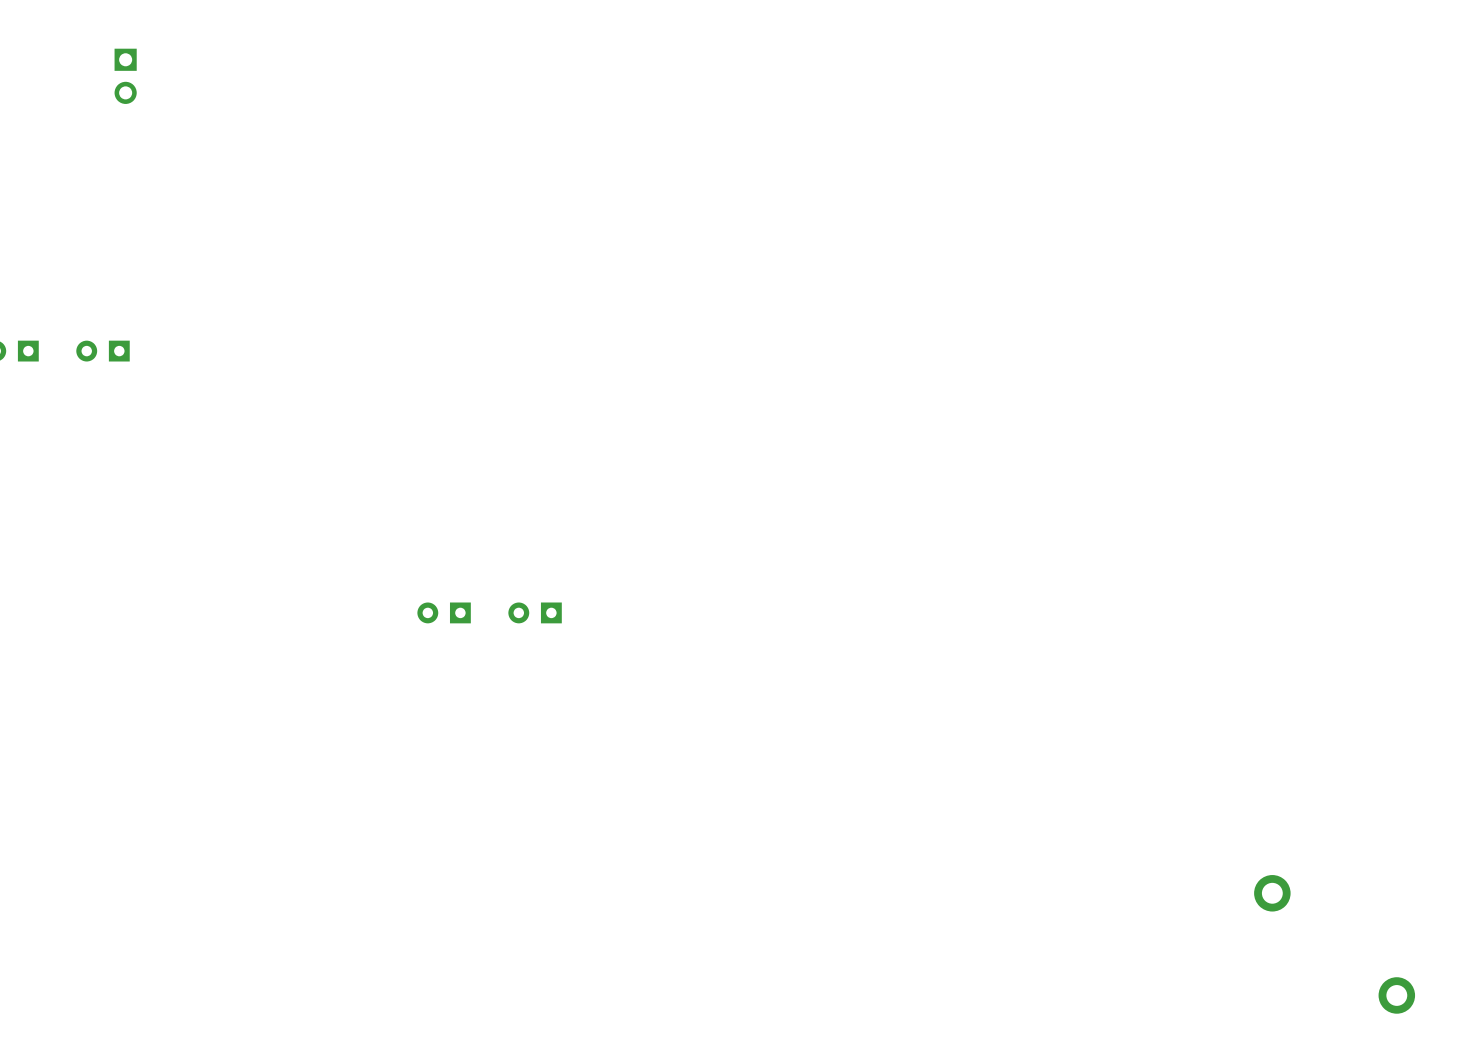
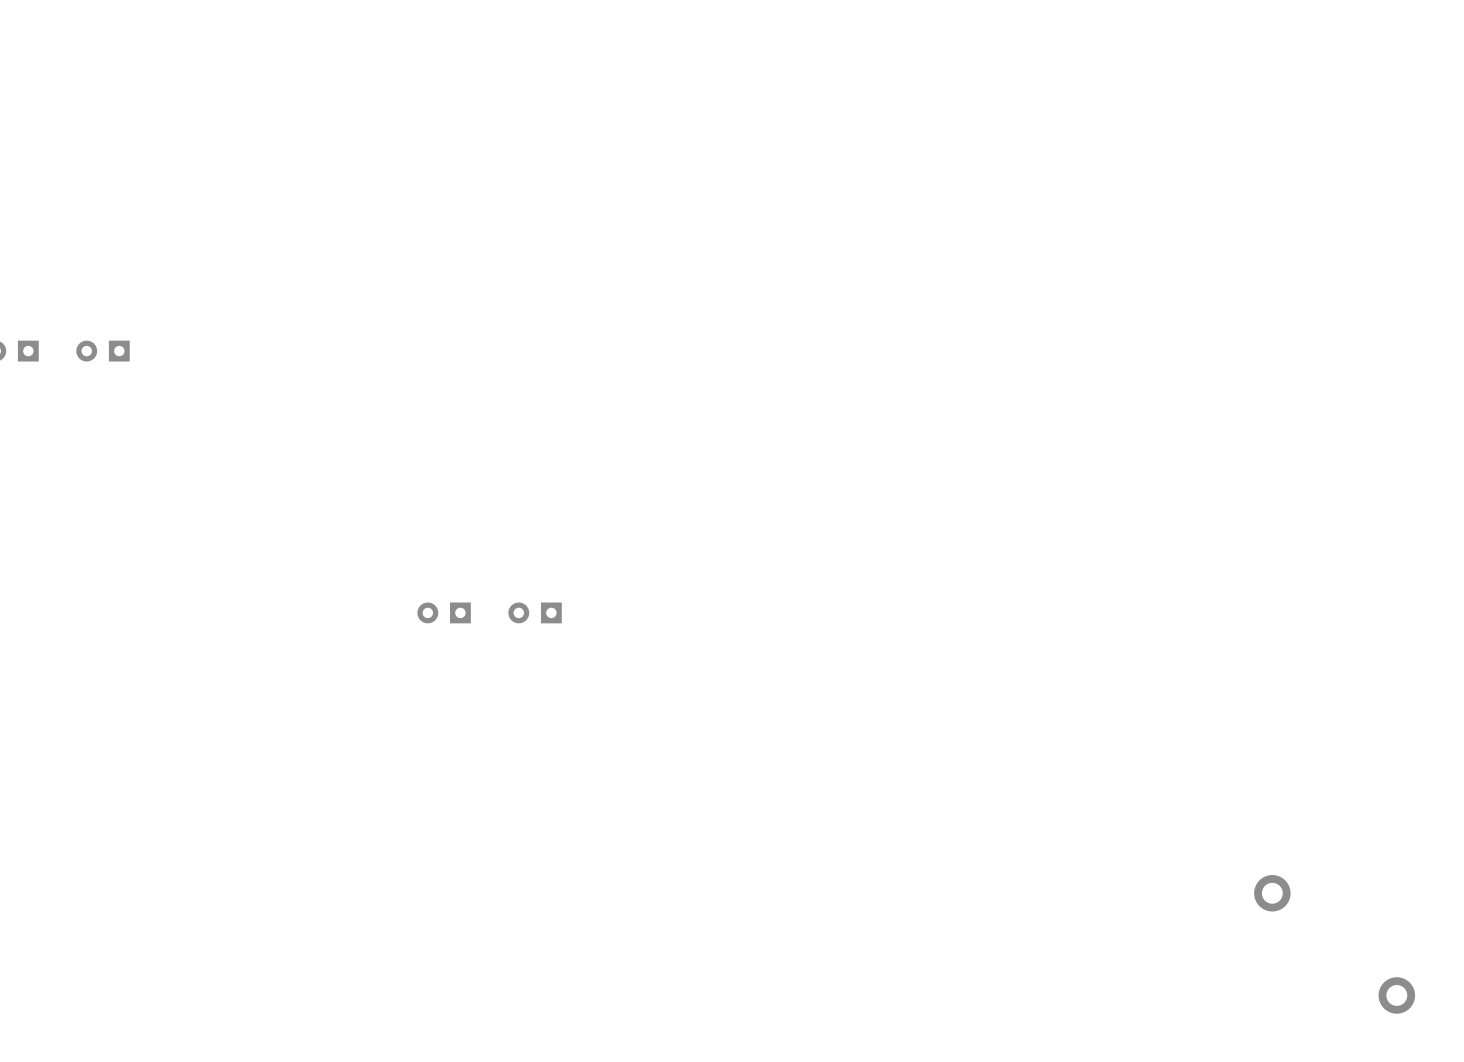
part: (125, 76) -> none

